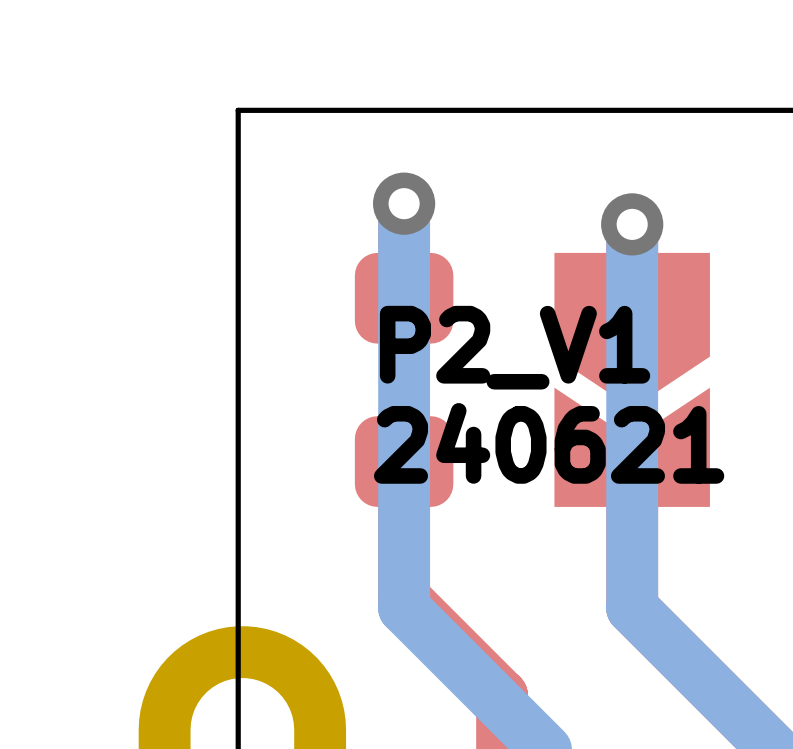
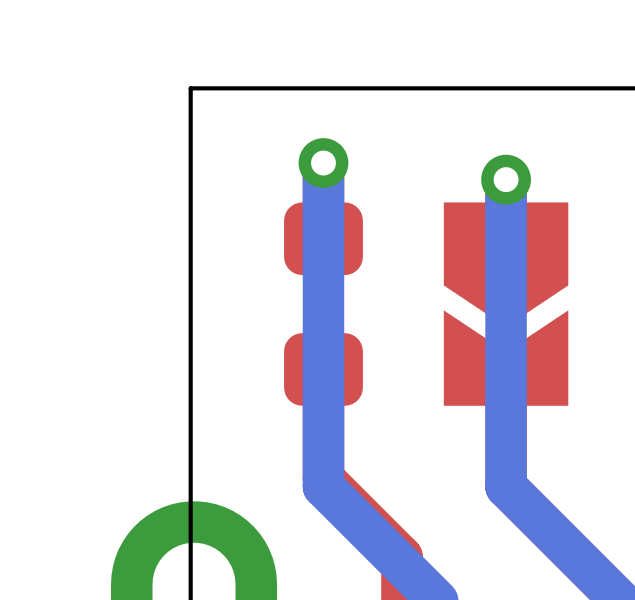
text: P2_V1 (515, 347) -> none
text: 240621 (549, 443) -> none

